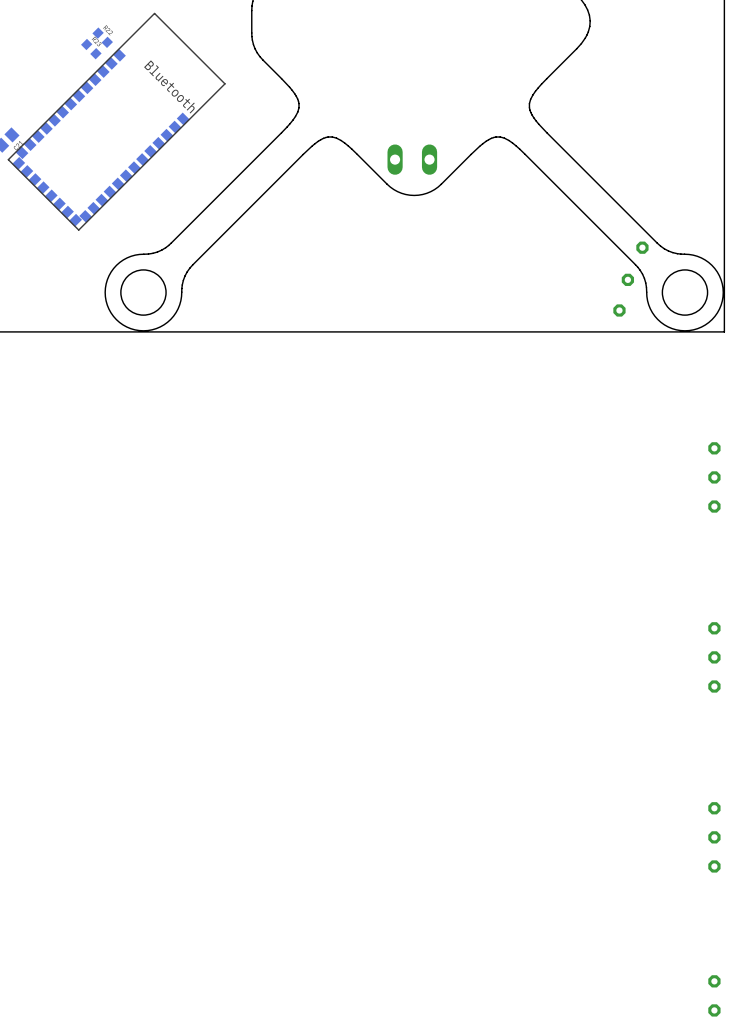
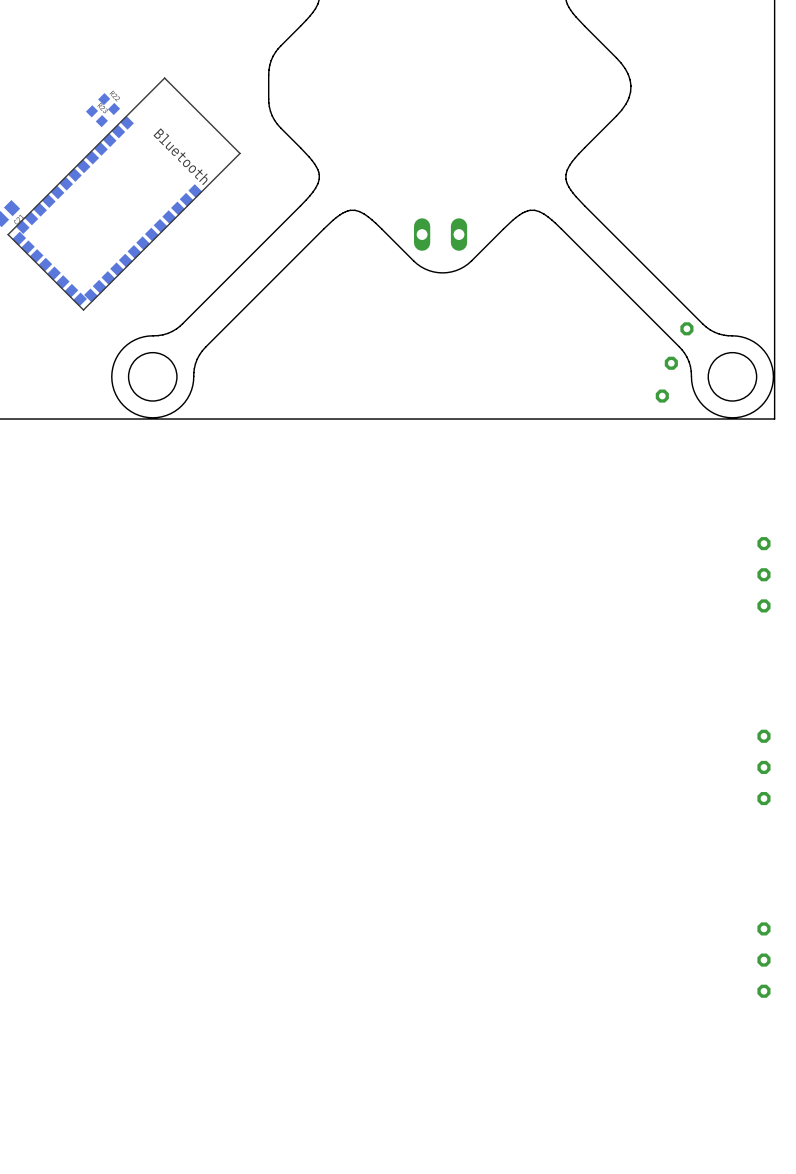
part: (714, 981) -> none
part: (714, 1010) -> none

